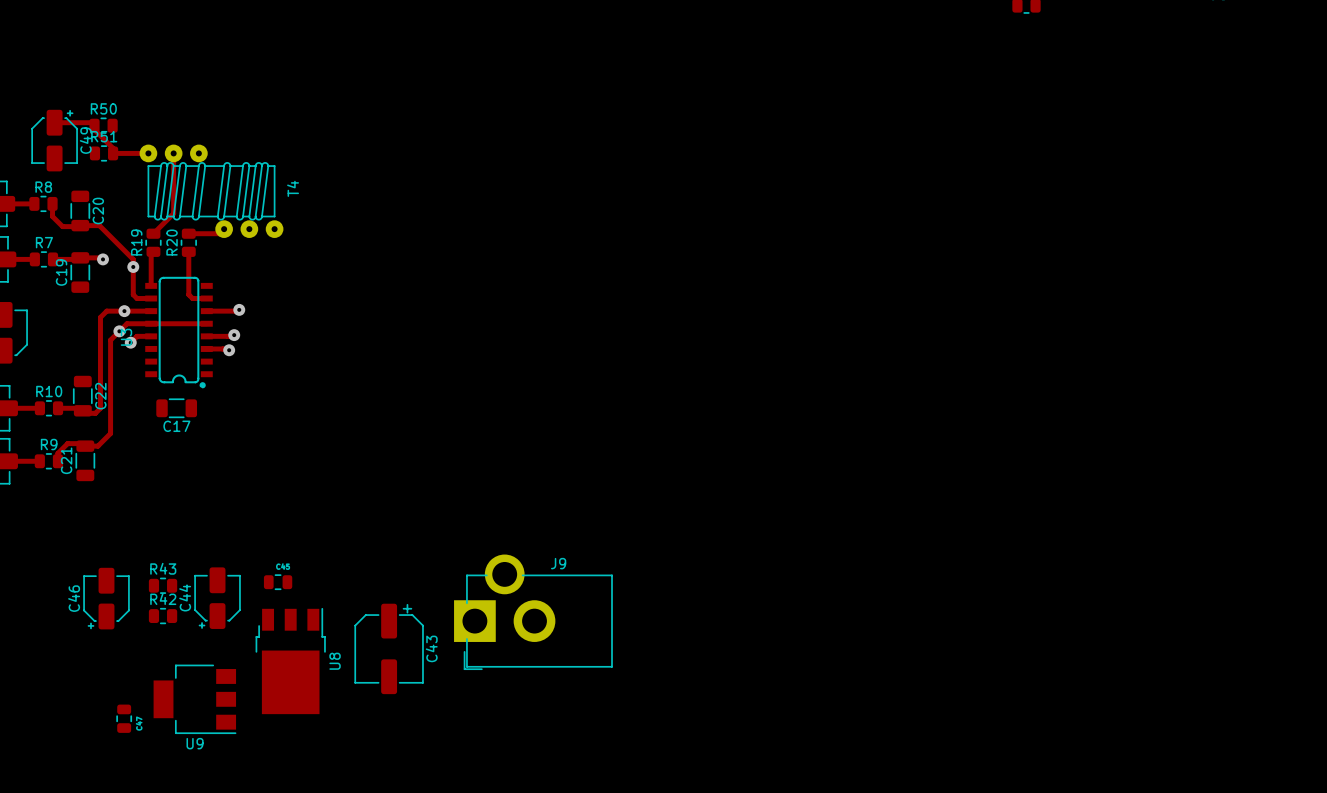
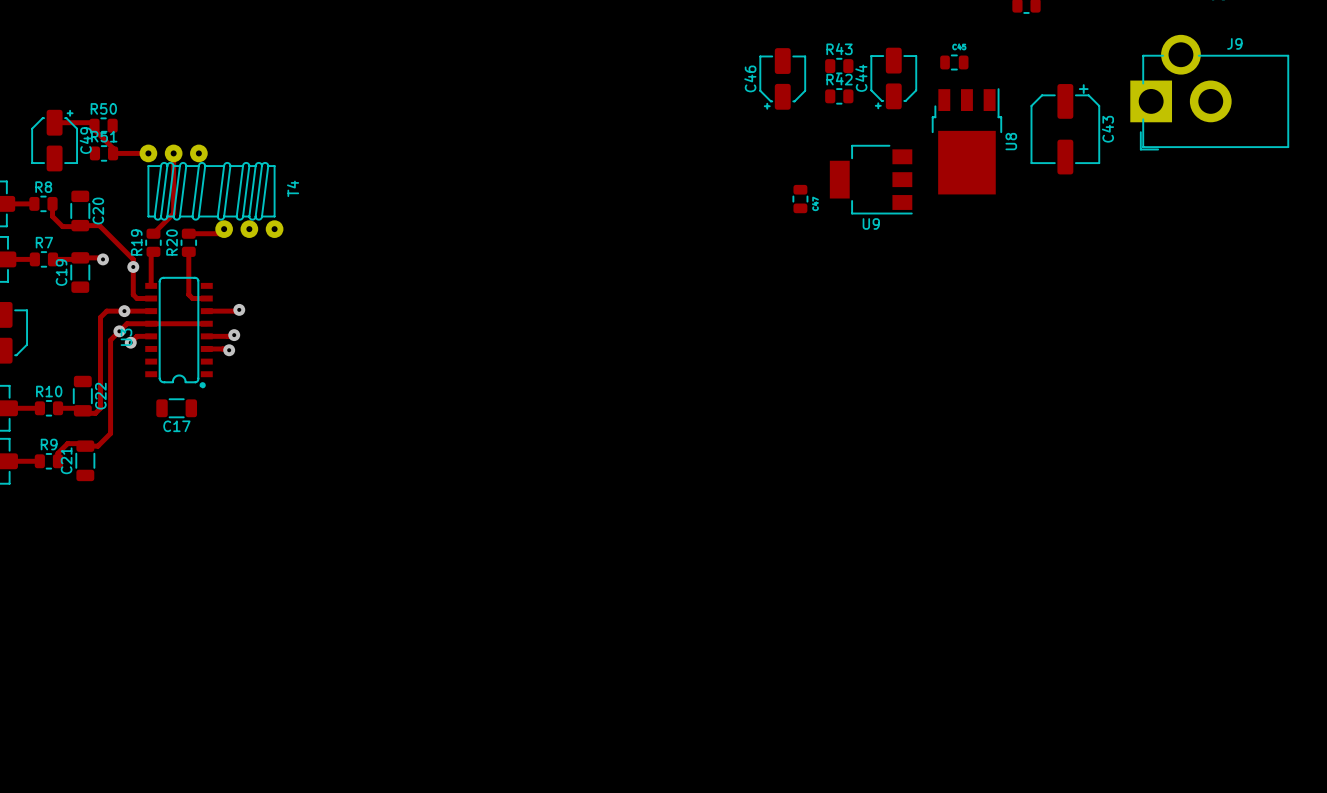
part position: (278, 582) -> (954, 62)
R43 position: (163, 585) -> (839, 66)
C46 position: (106, 598) -> (782, 78)
C44 position: (217, 598) -> (893, 78)
J9 position: (533, 612) -> (1209, 92)
R42 position: (163, 616) -> (839, 96)
C43 position: (389, 648) -> (1065, 129)
U8 position: (290, 661) -> (966, 141)
U9 position: (194, 699) -> (871, 179)
part position: (124, 718) -> (800, 199)

